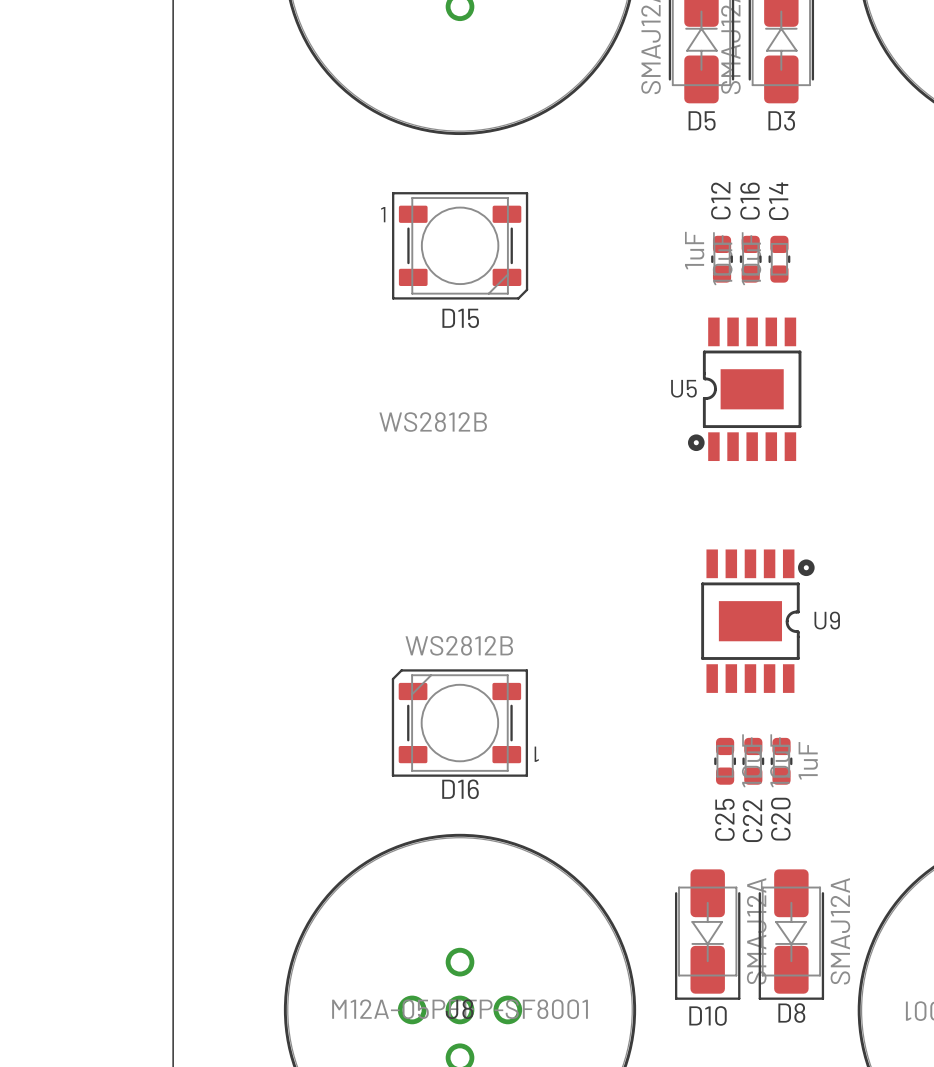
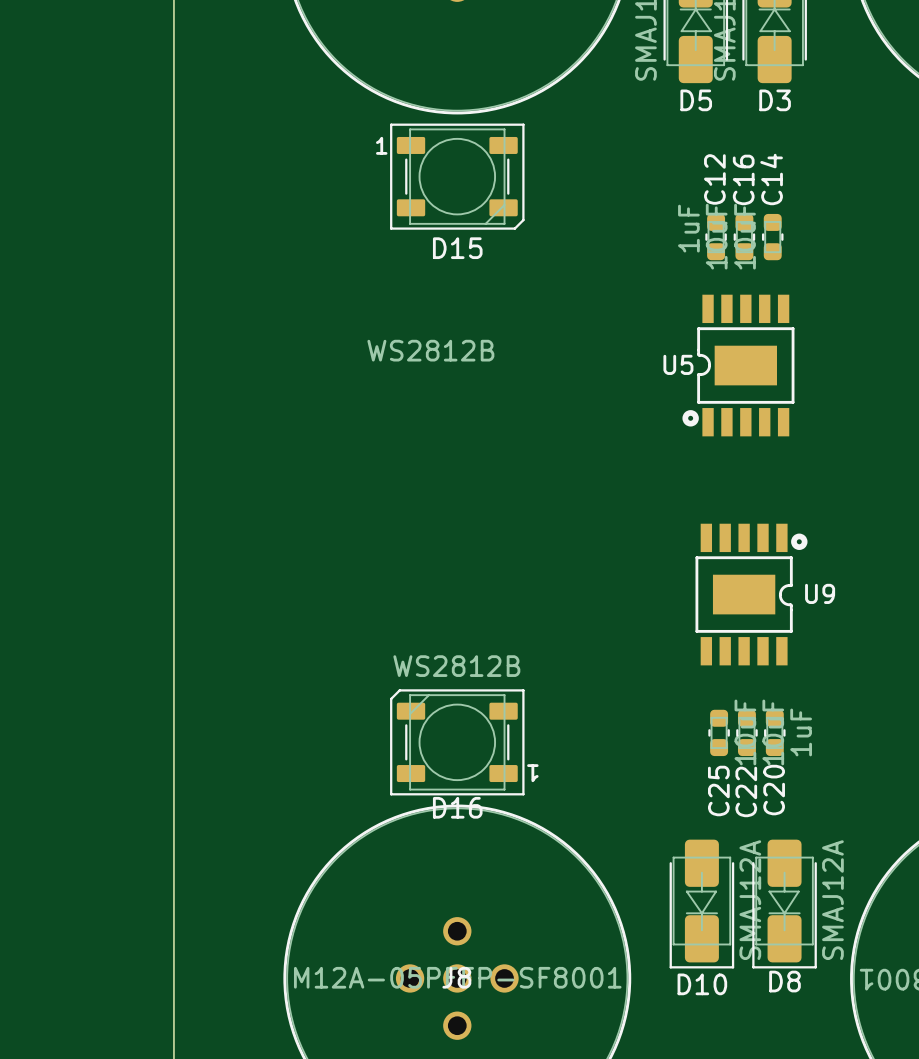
D15 position: (460, 245) -> (457, 176)
D16 position: (459, 723) -> (457, 742)

